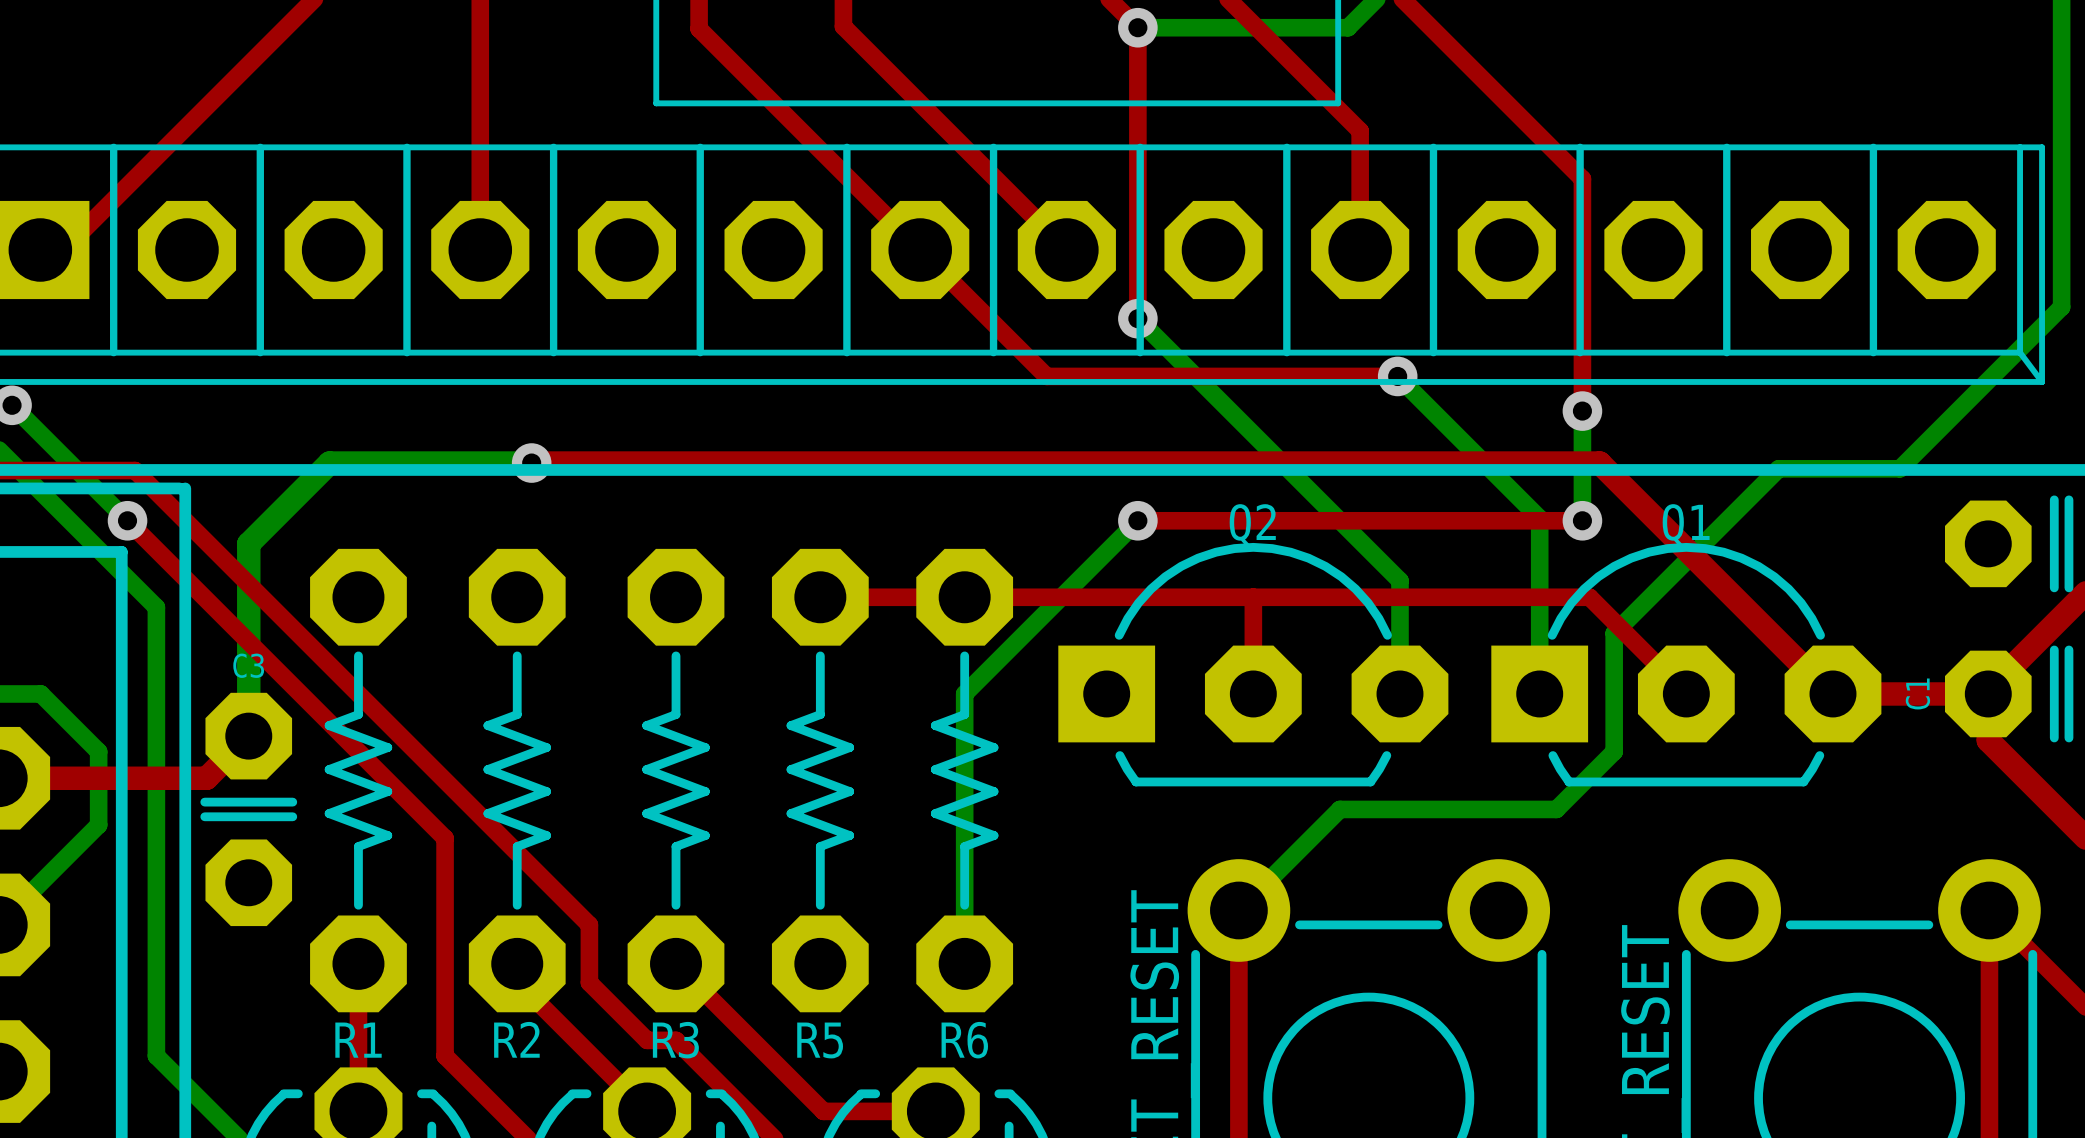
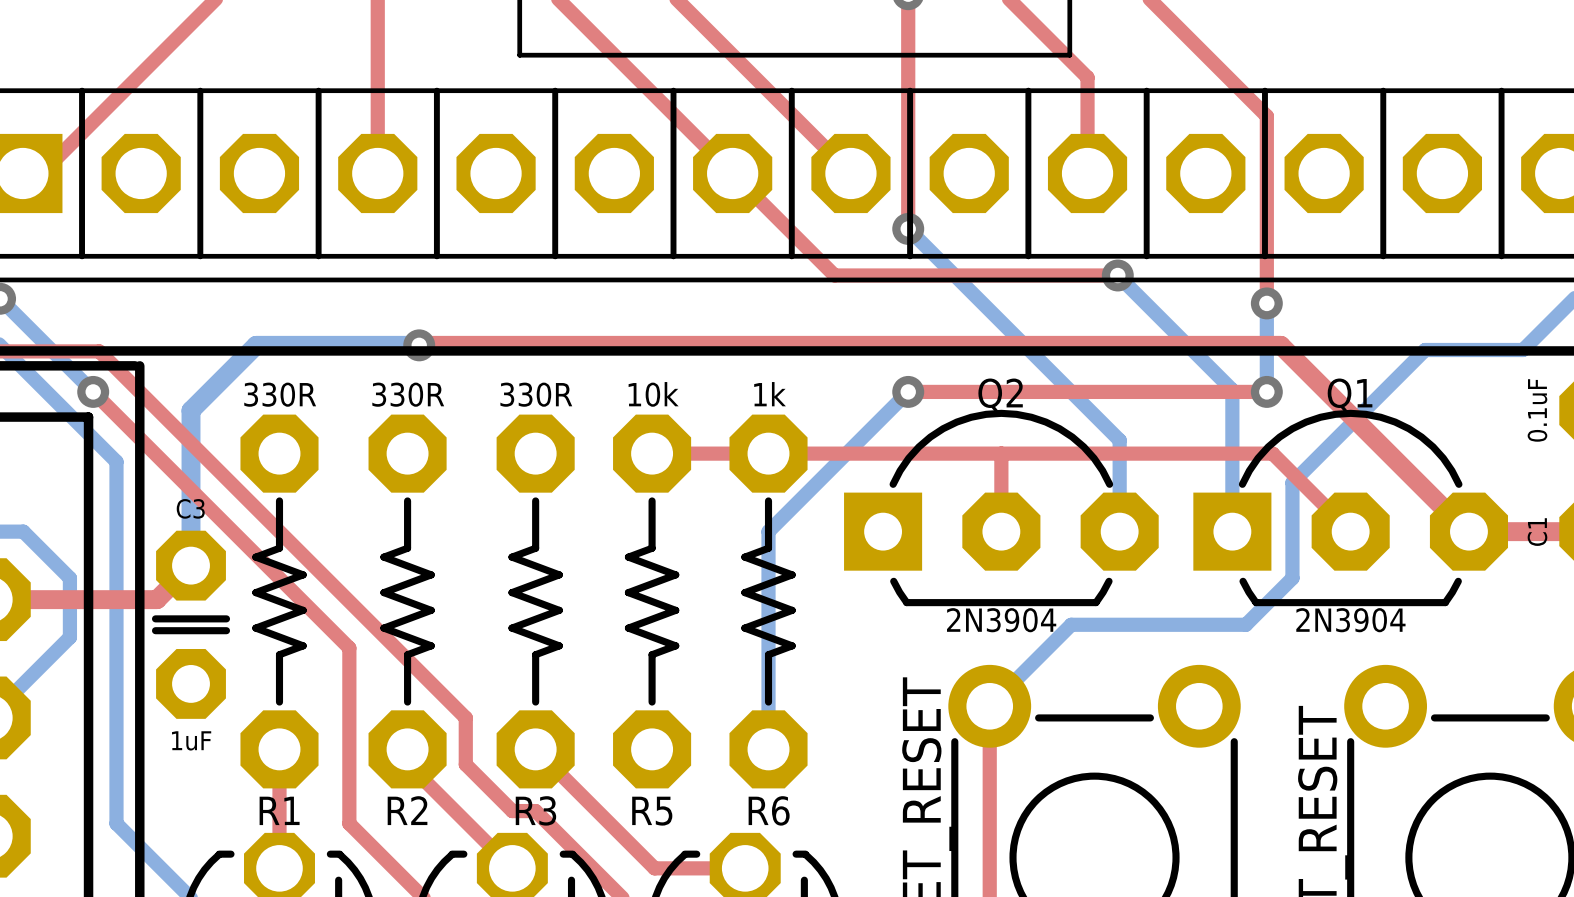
R5 value: none -> 10k (653, 394)
R6 value: none -> 1k (770, 394)
R1 value: none -> 330R (280, 394)
R2 value: none -> 330R (408, 394)
R3 value: none -> 330R (536, 394)
part value: none -> 0.1uF (1537, 410)
Q2 value: none -> 2N3904 (1001, 620)
Q1 value: none -> 2N3904 (1350, 620)
C3 value: none -> 1uF (191, 740)

